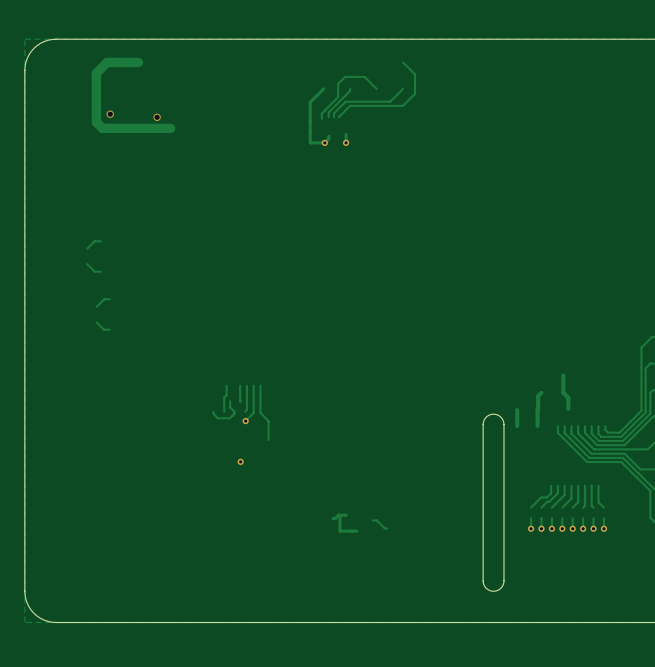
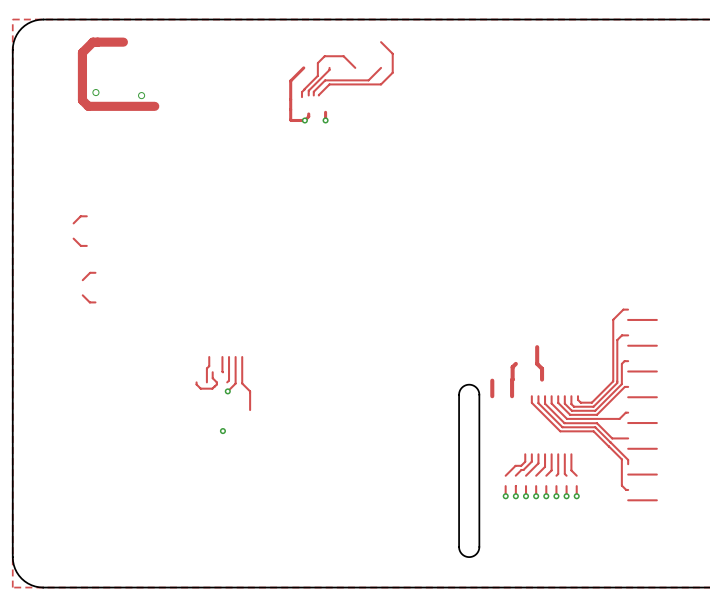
track: (338, 515) (333, 518) -> none
track: (338, 515) (340, 531) (356, 531) -> none
track: (338, 515) (346, 515) -> none
track: (372, 520) (376, 520) (384, 528) (387, 528) -> none

